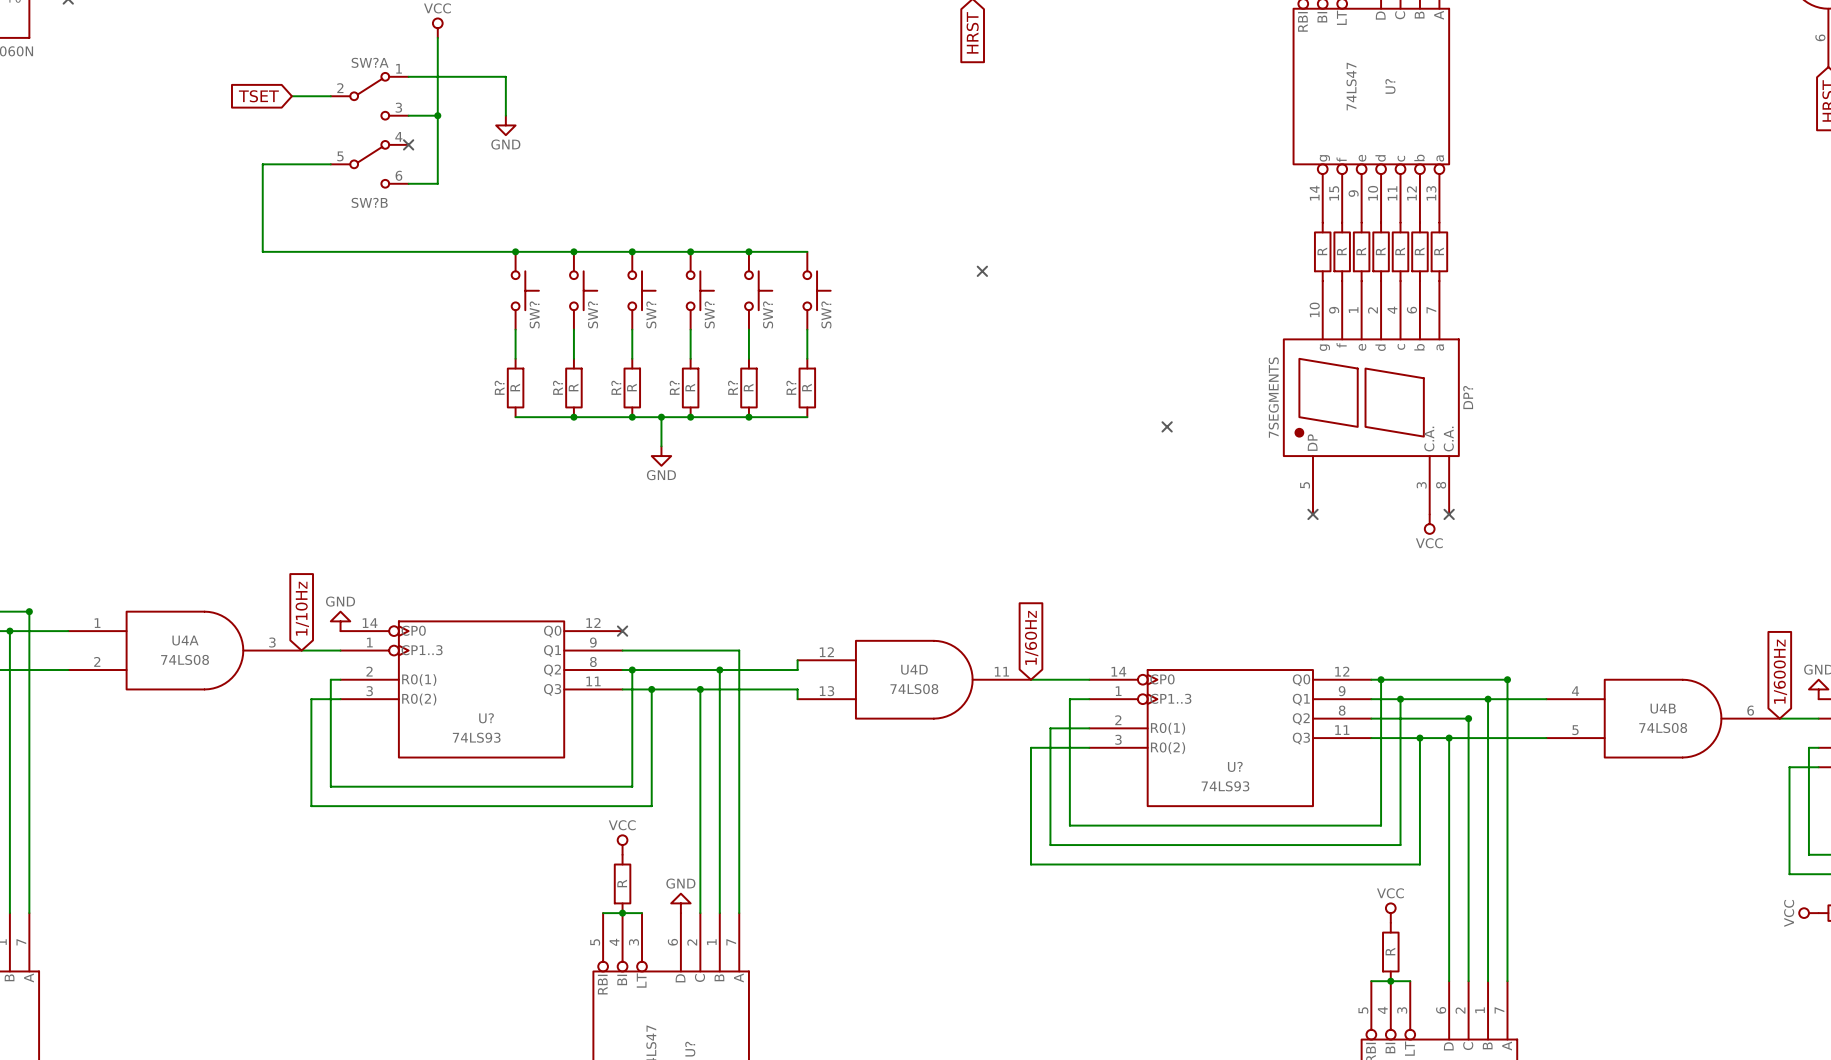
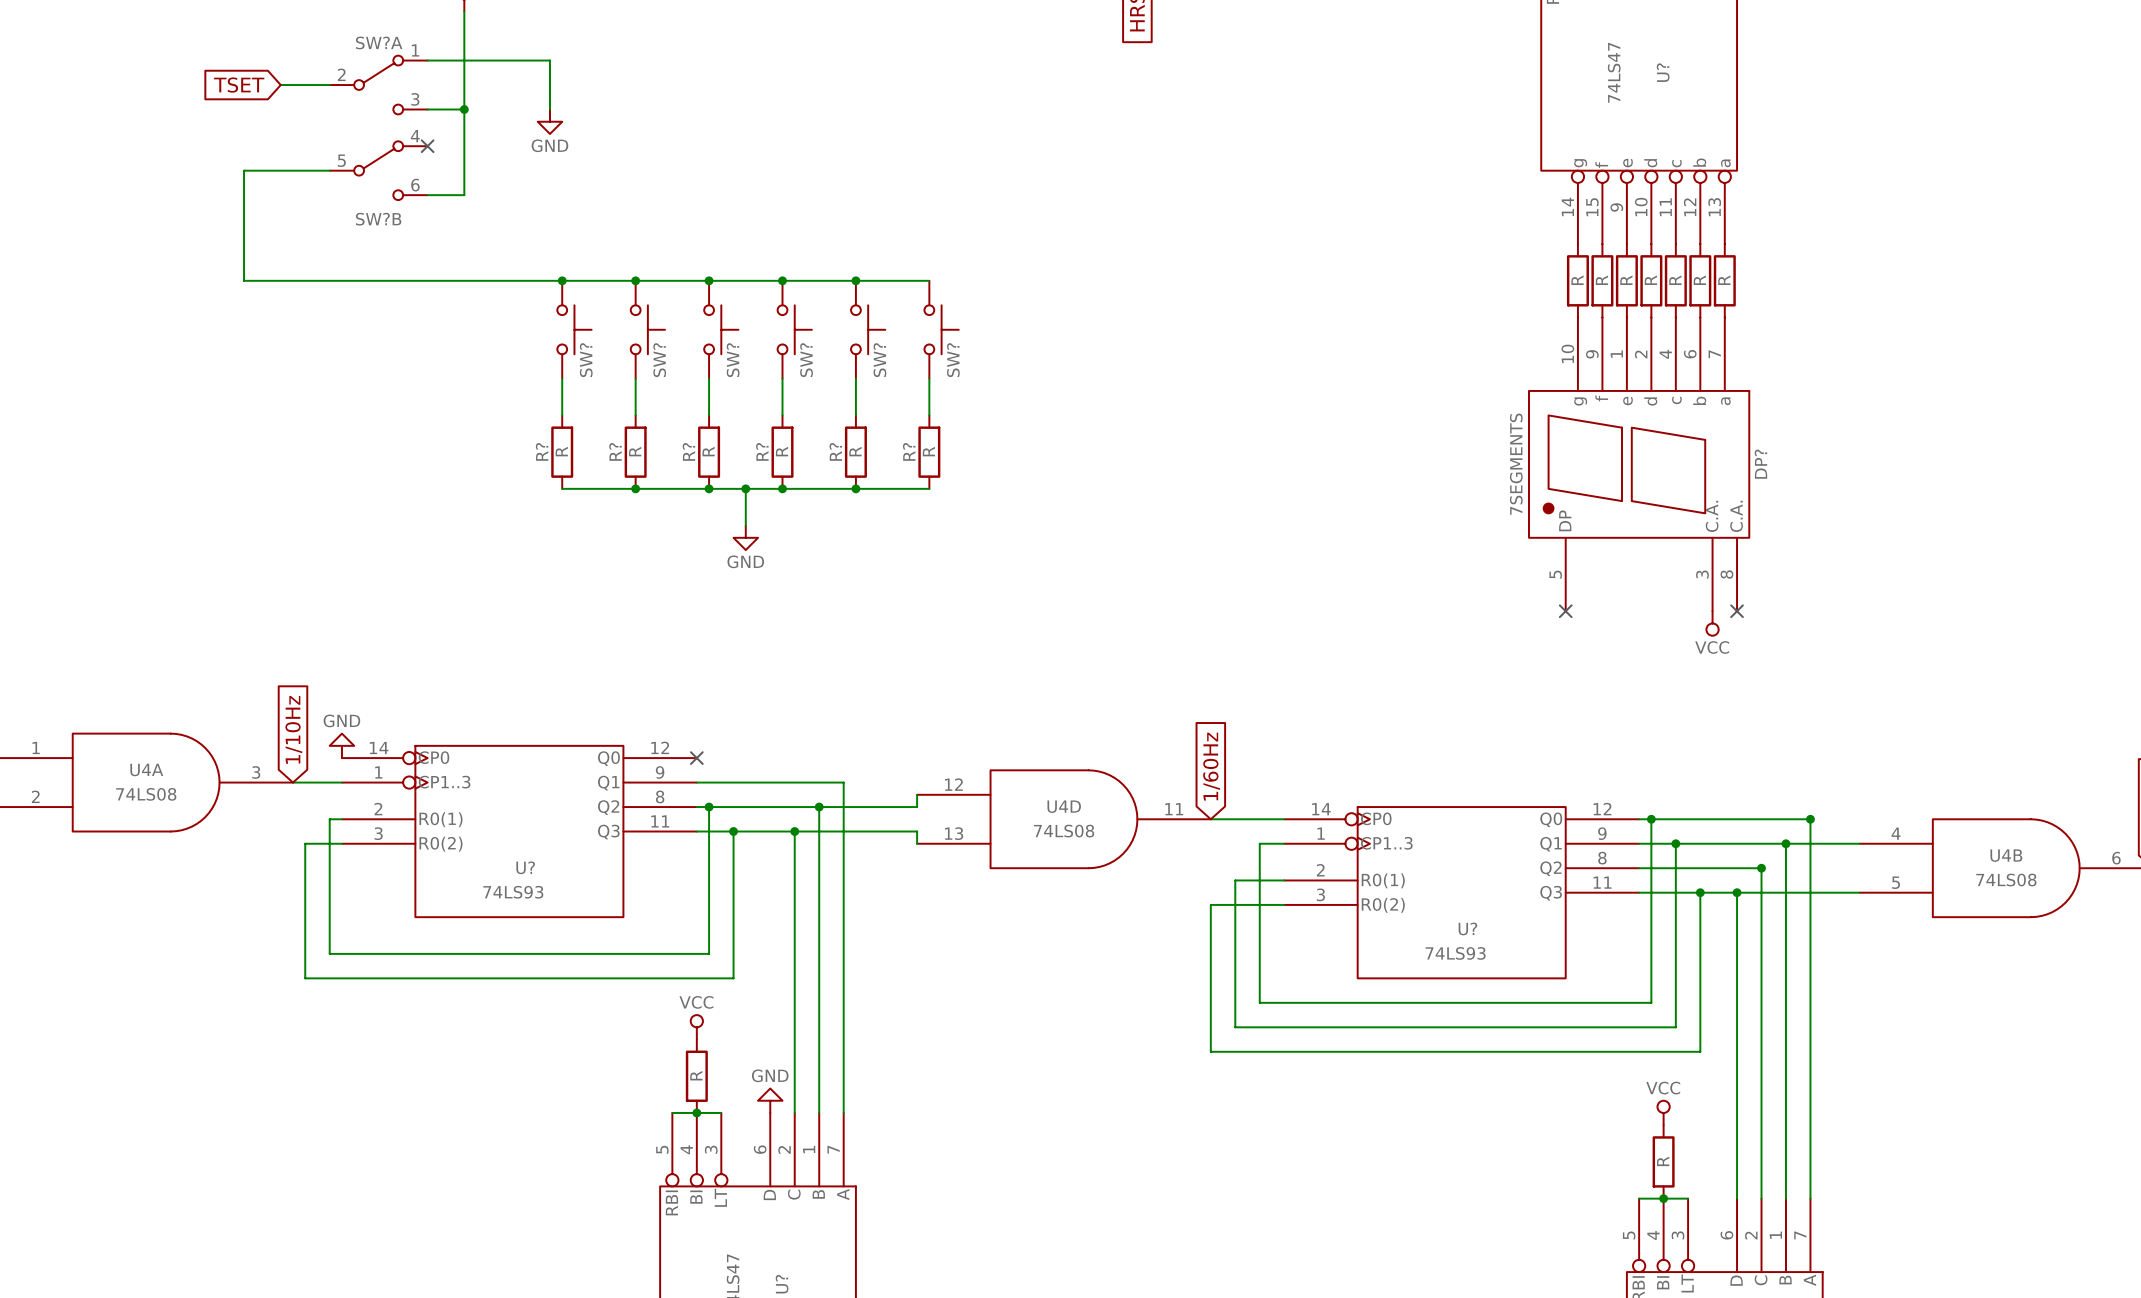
no-connect mark: (982, 271) -> none
no-connect mark: (1167, 426) -> none

